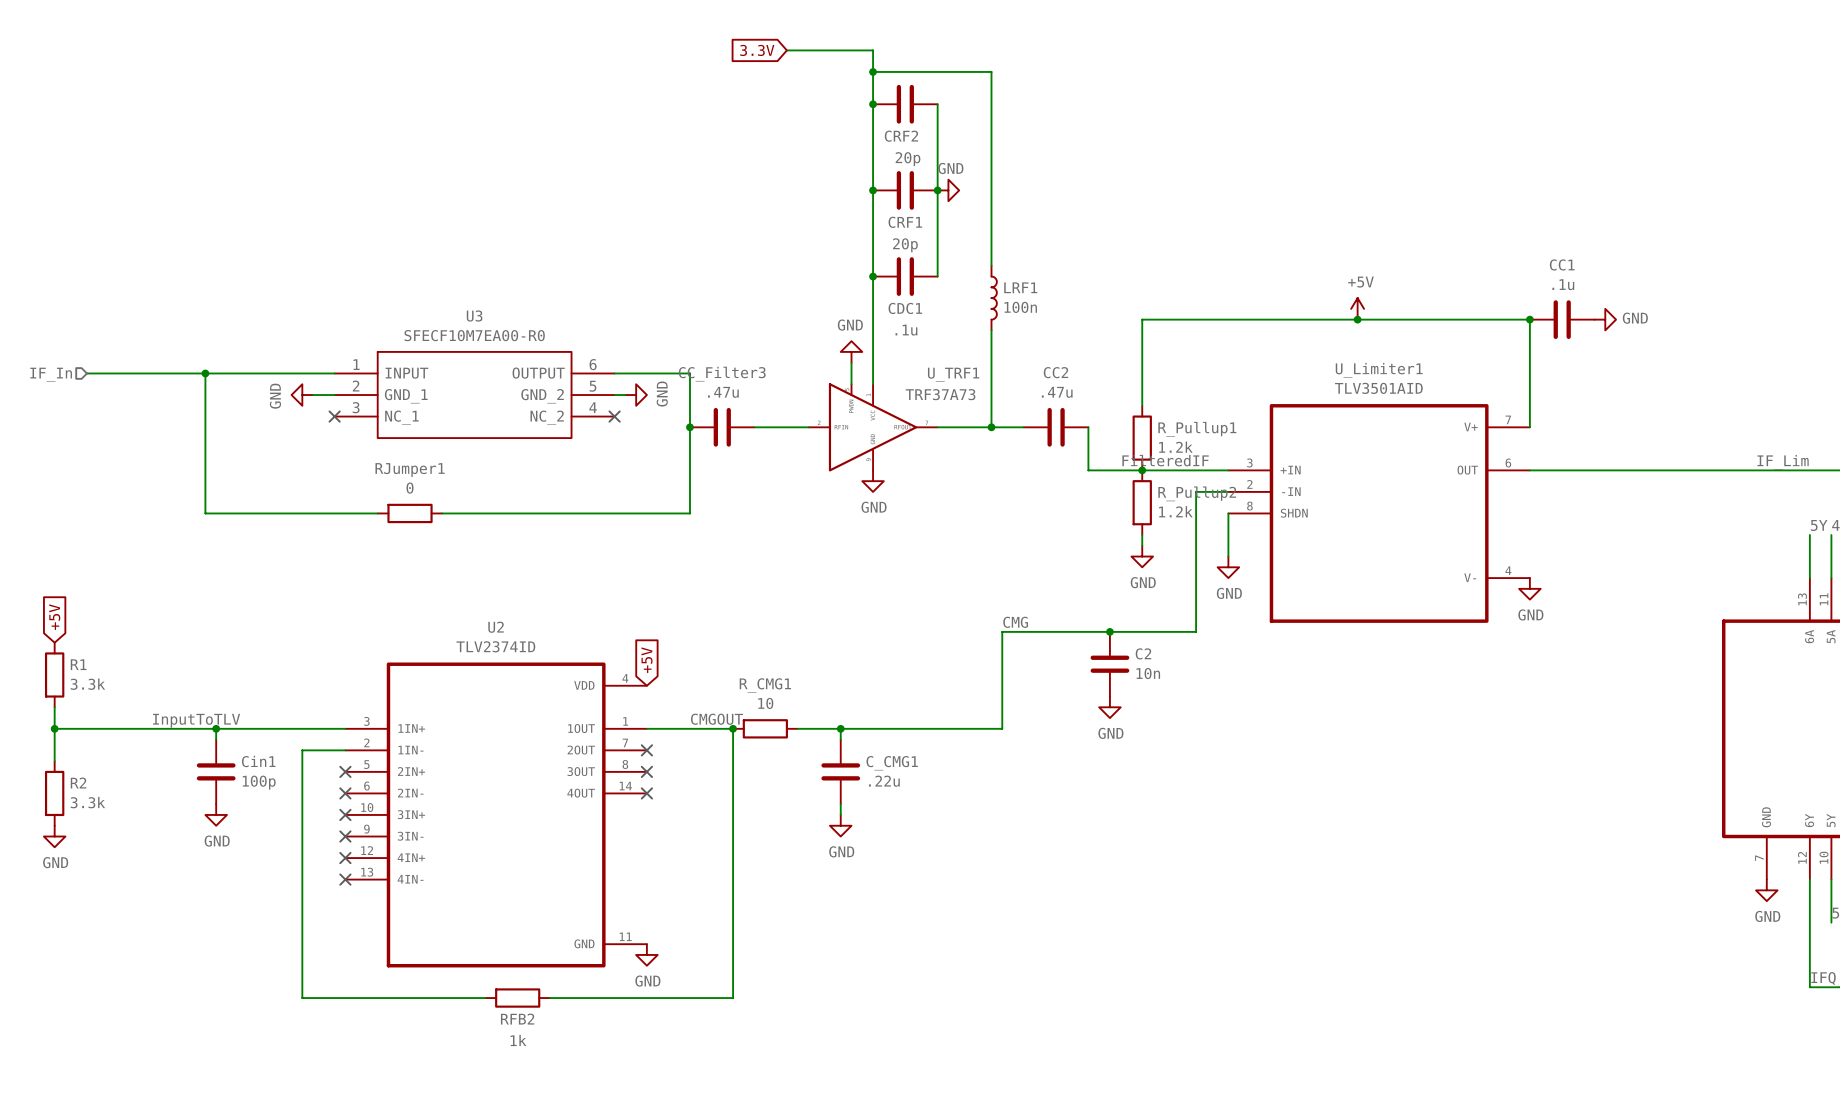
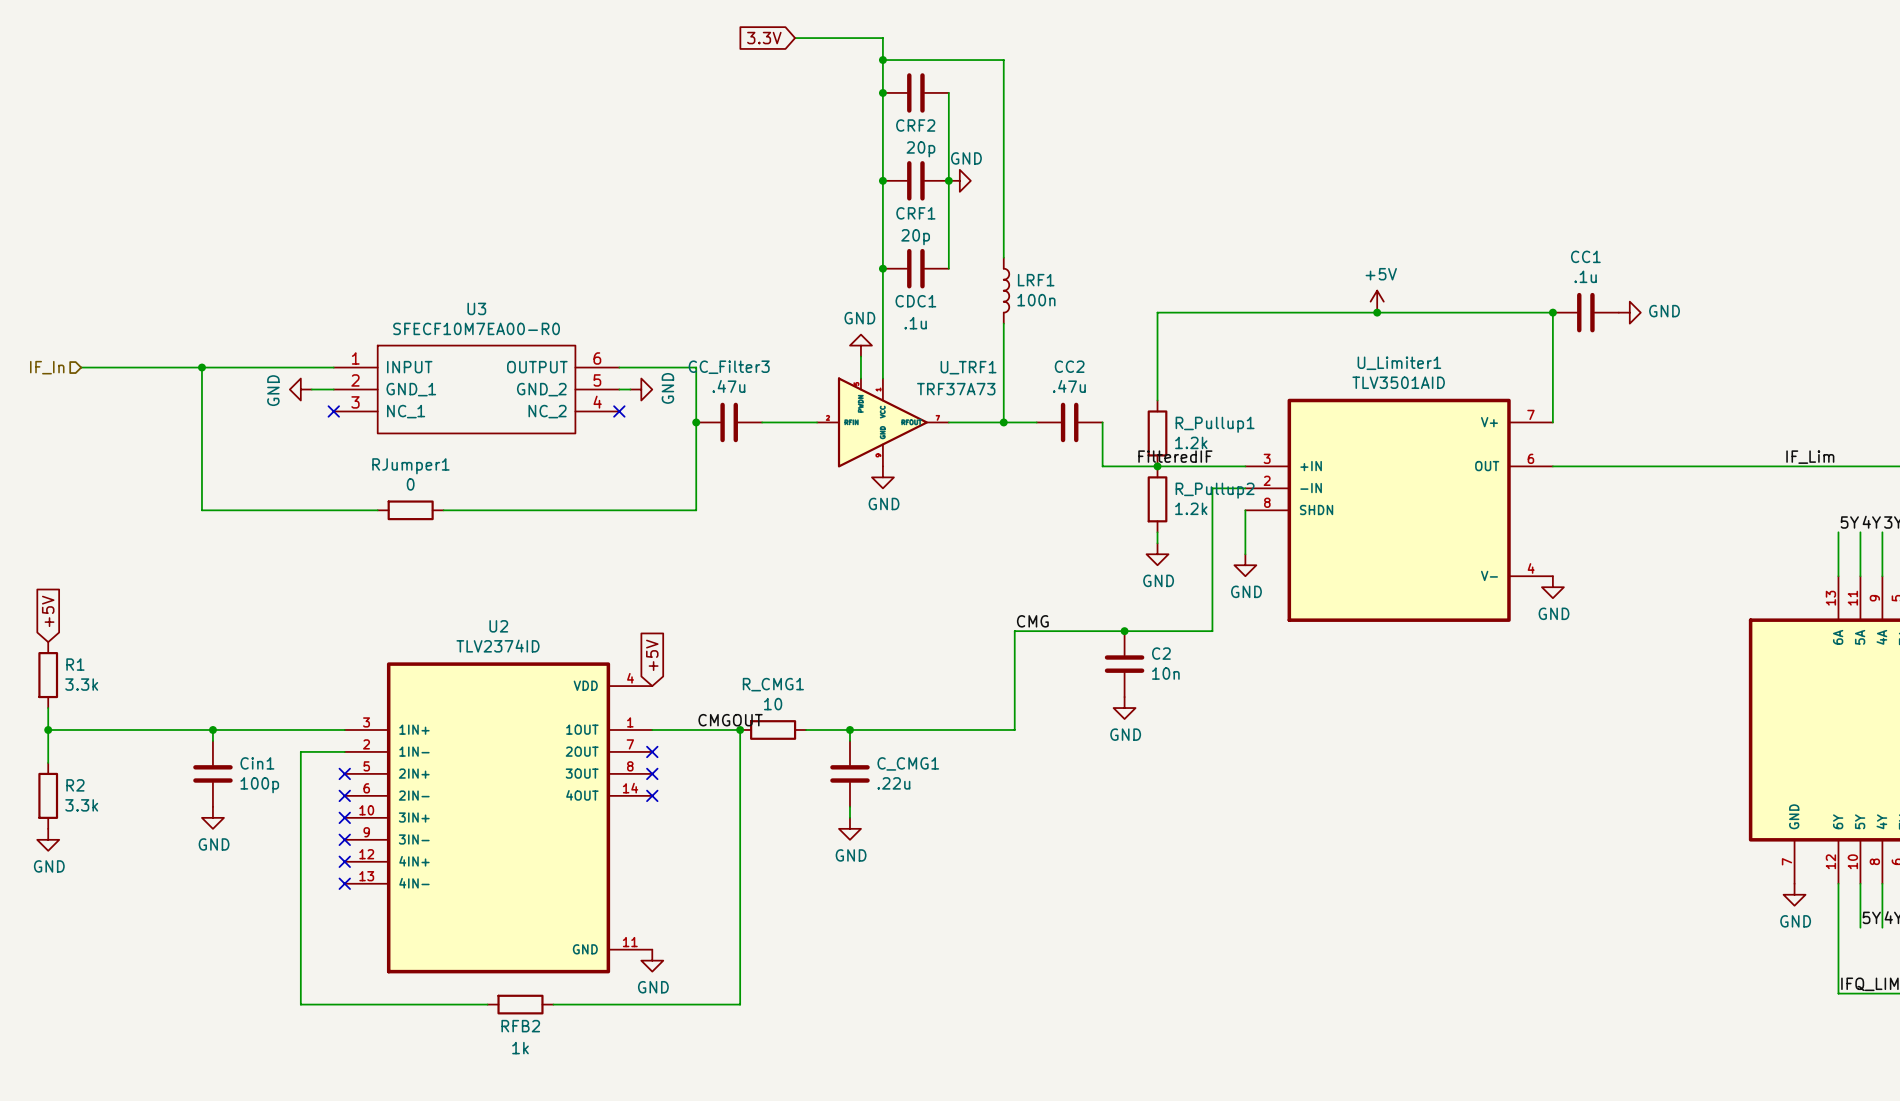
label: InputToTLV (196, 720) -> none

